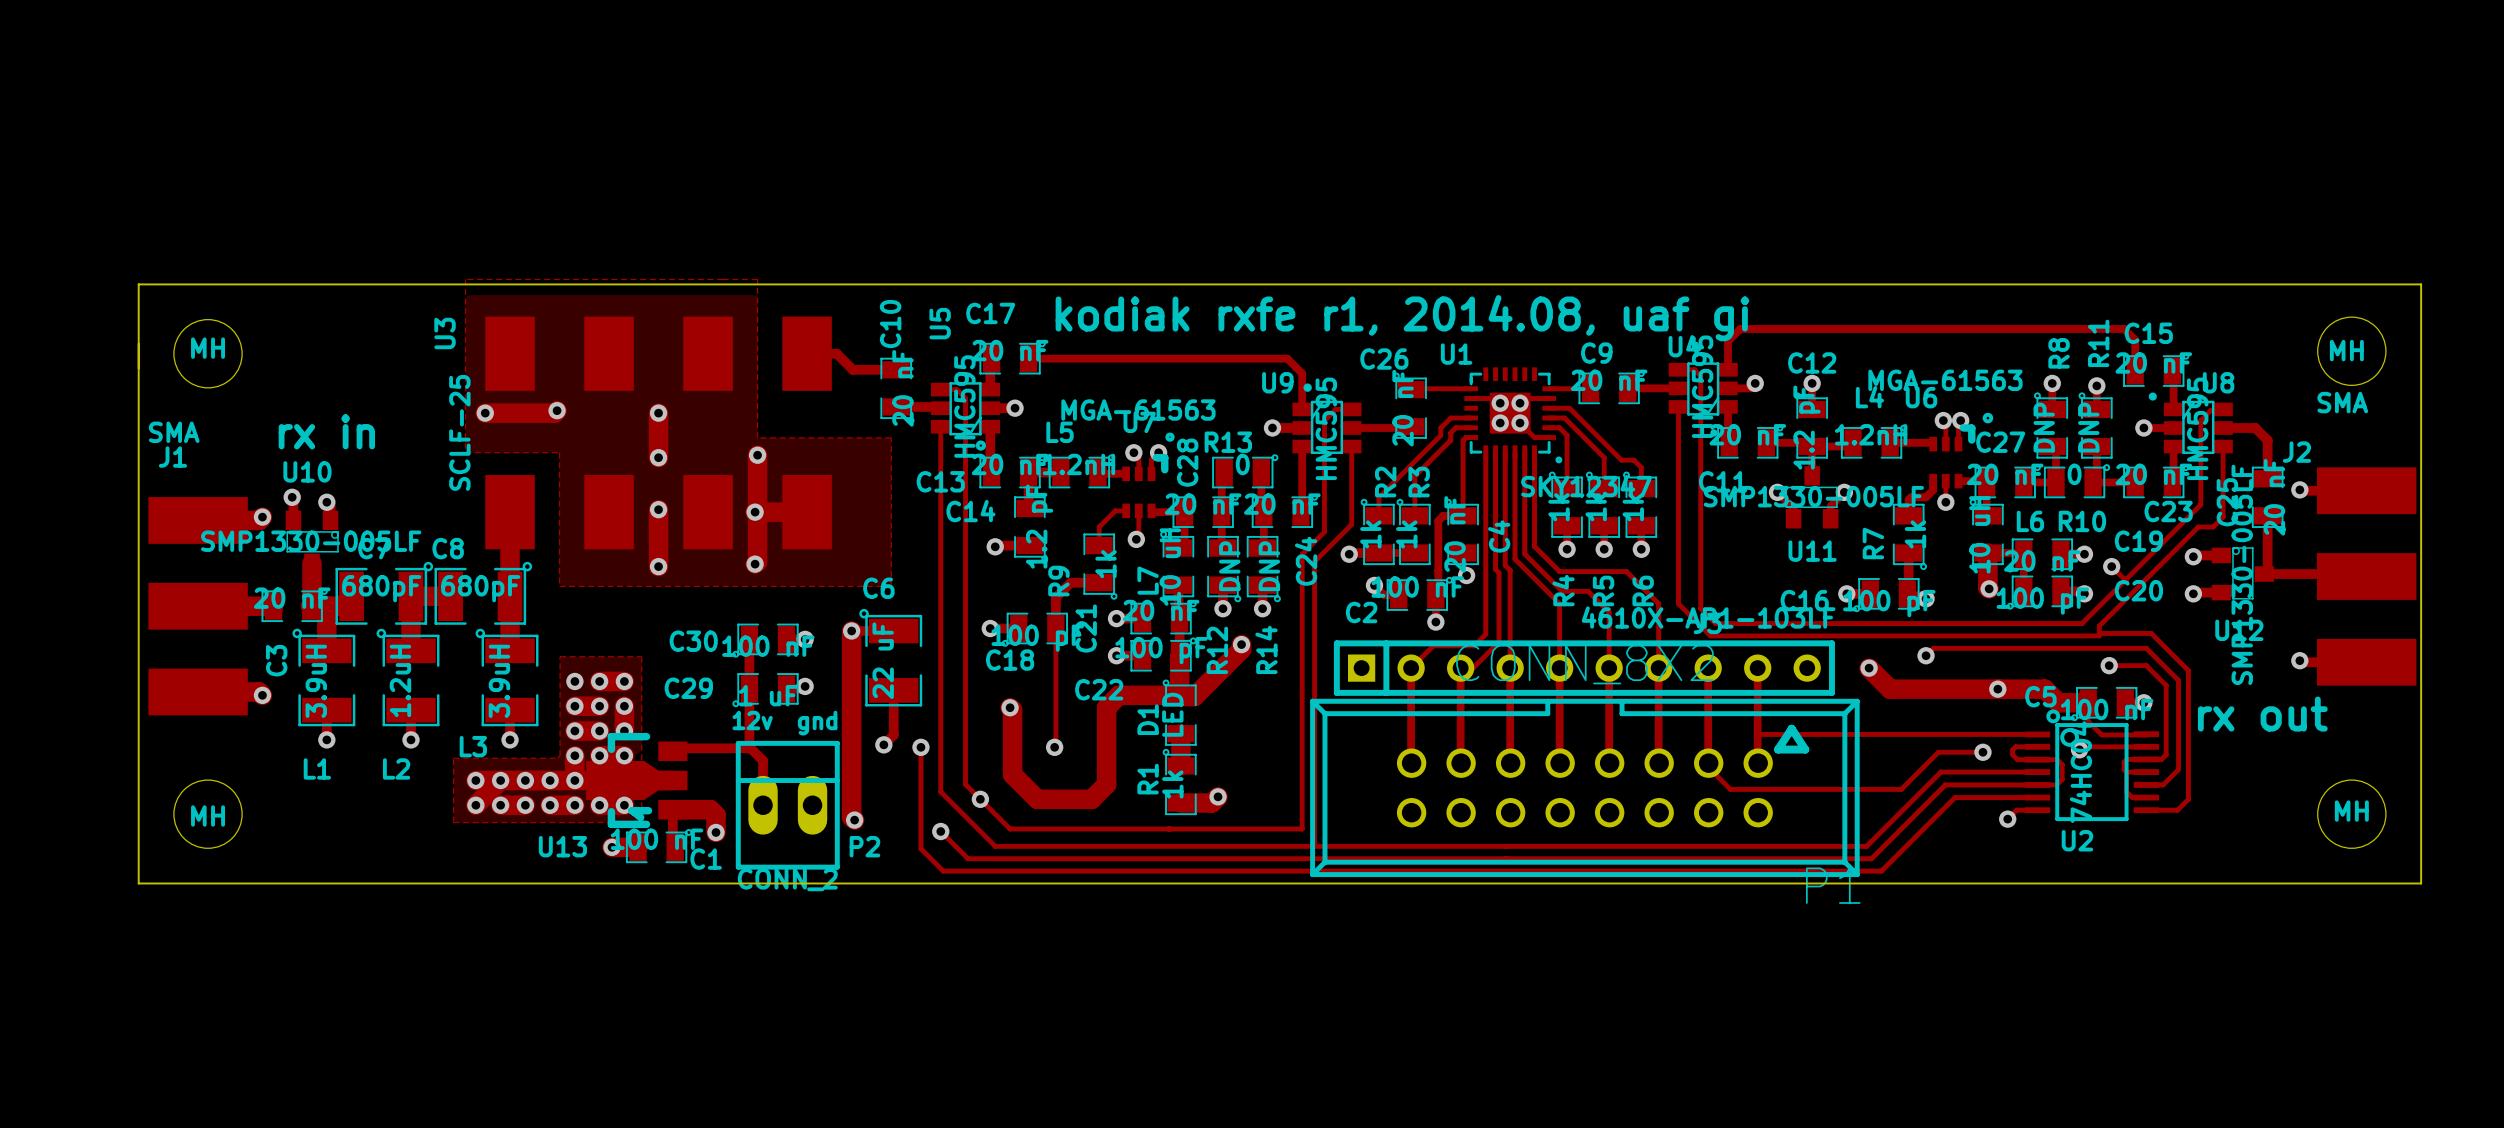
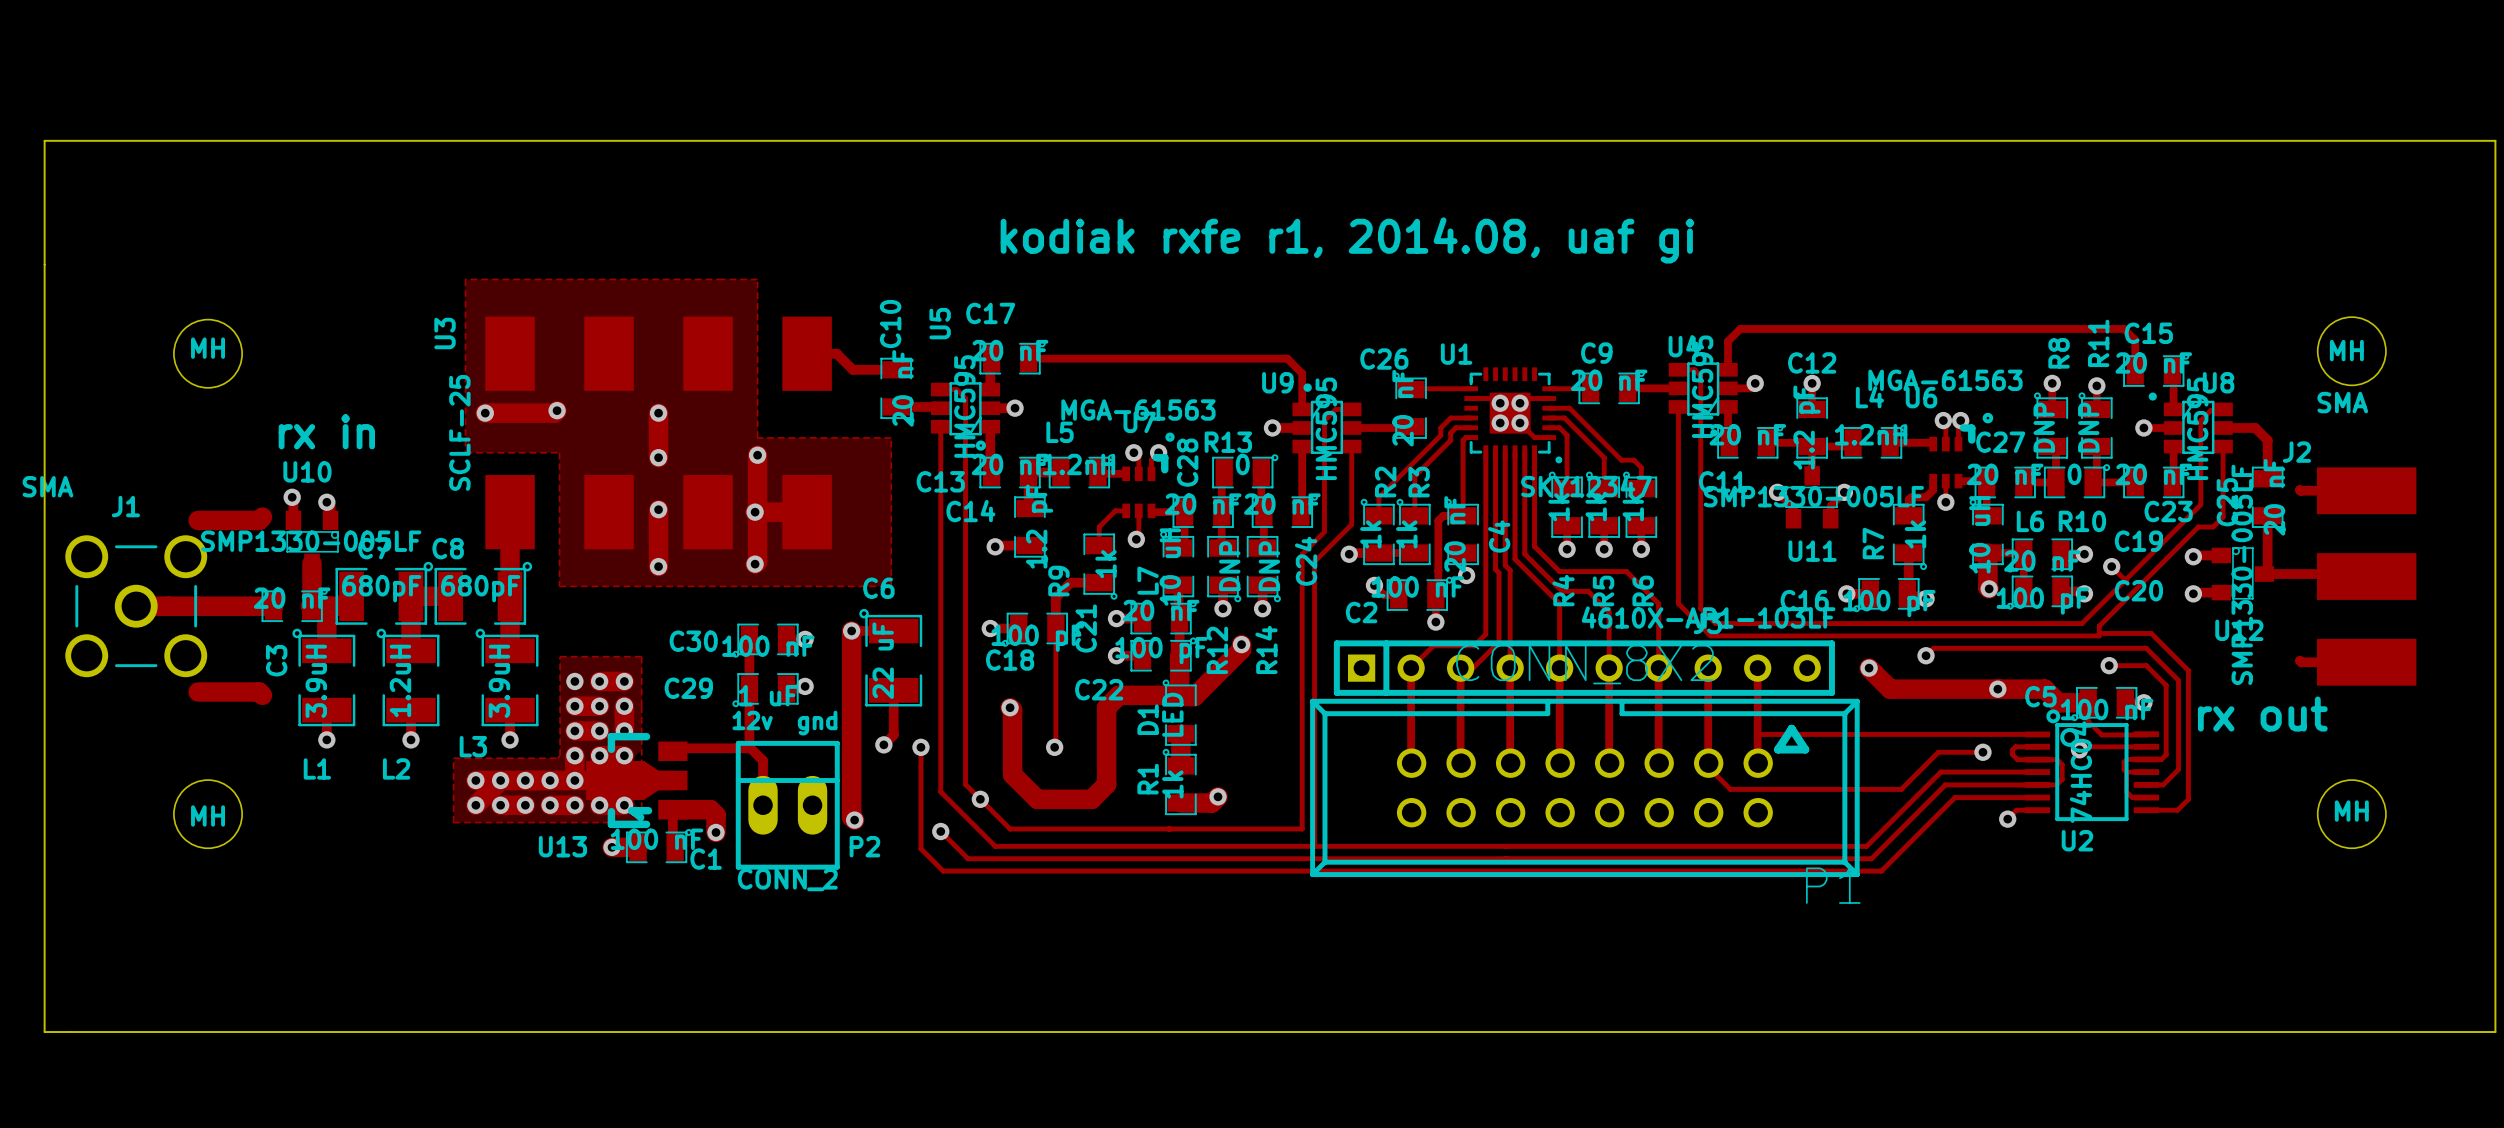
board edge: (138, 284) (2421, 284) (2421, 883) (138, 883) (138, 284) -> (44, 140) (44, 1032) (2495, 1032) (2495, 140) (44, 140)
text position: kodiak rxfe r1, 2014.08, uaf gi (1402, 318) -> kodiak rxfe r1, 2014.08, uaf gi (1347, 240)
J1 value position: SMA (174, 432) -> SMA (47, 486)
J1 name position: J1 (172, 457) -> J1 (125, 506)
via: (2299, 489) -> none
J1 footprint: [148, 497, 248, 716] -> [65, 535, 208, 678]
via: (262, 517) -> none
track: none -> (136, 606) (198, 606)
via: (2299, 660) -> none
via: (262, 695) -> none

